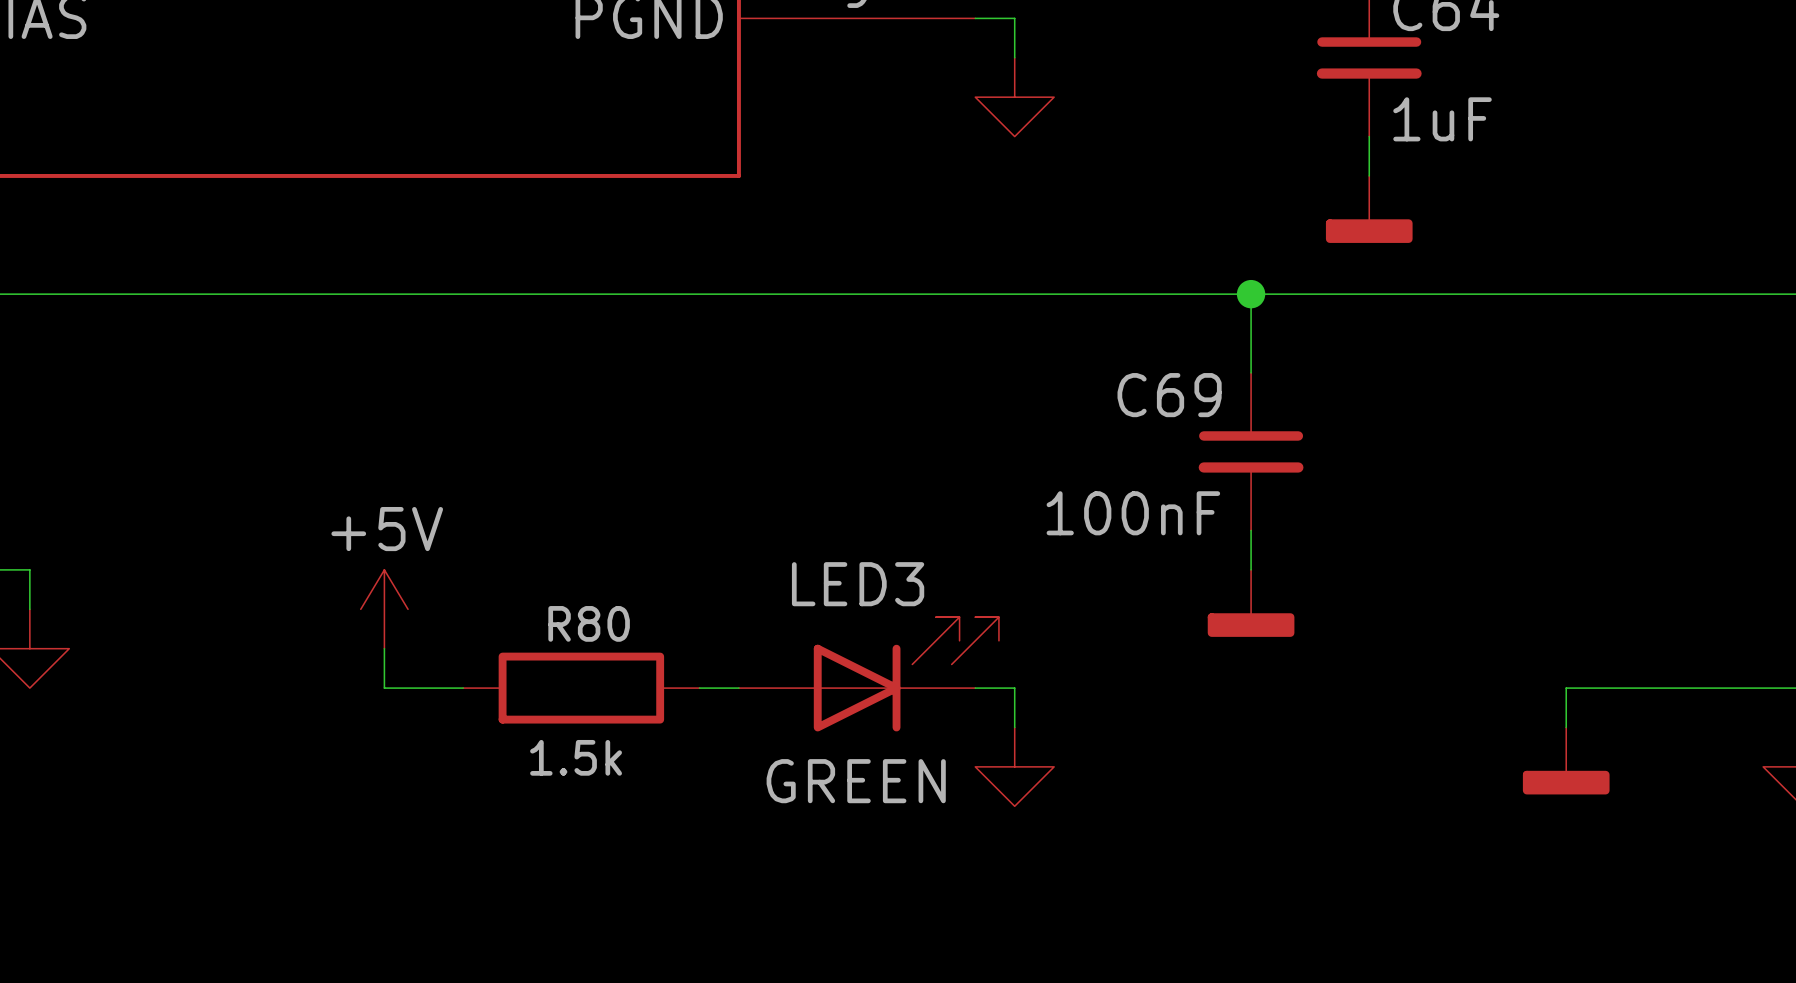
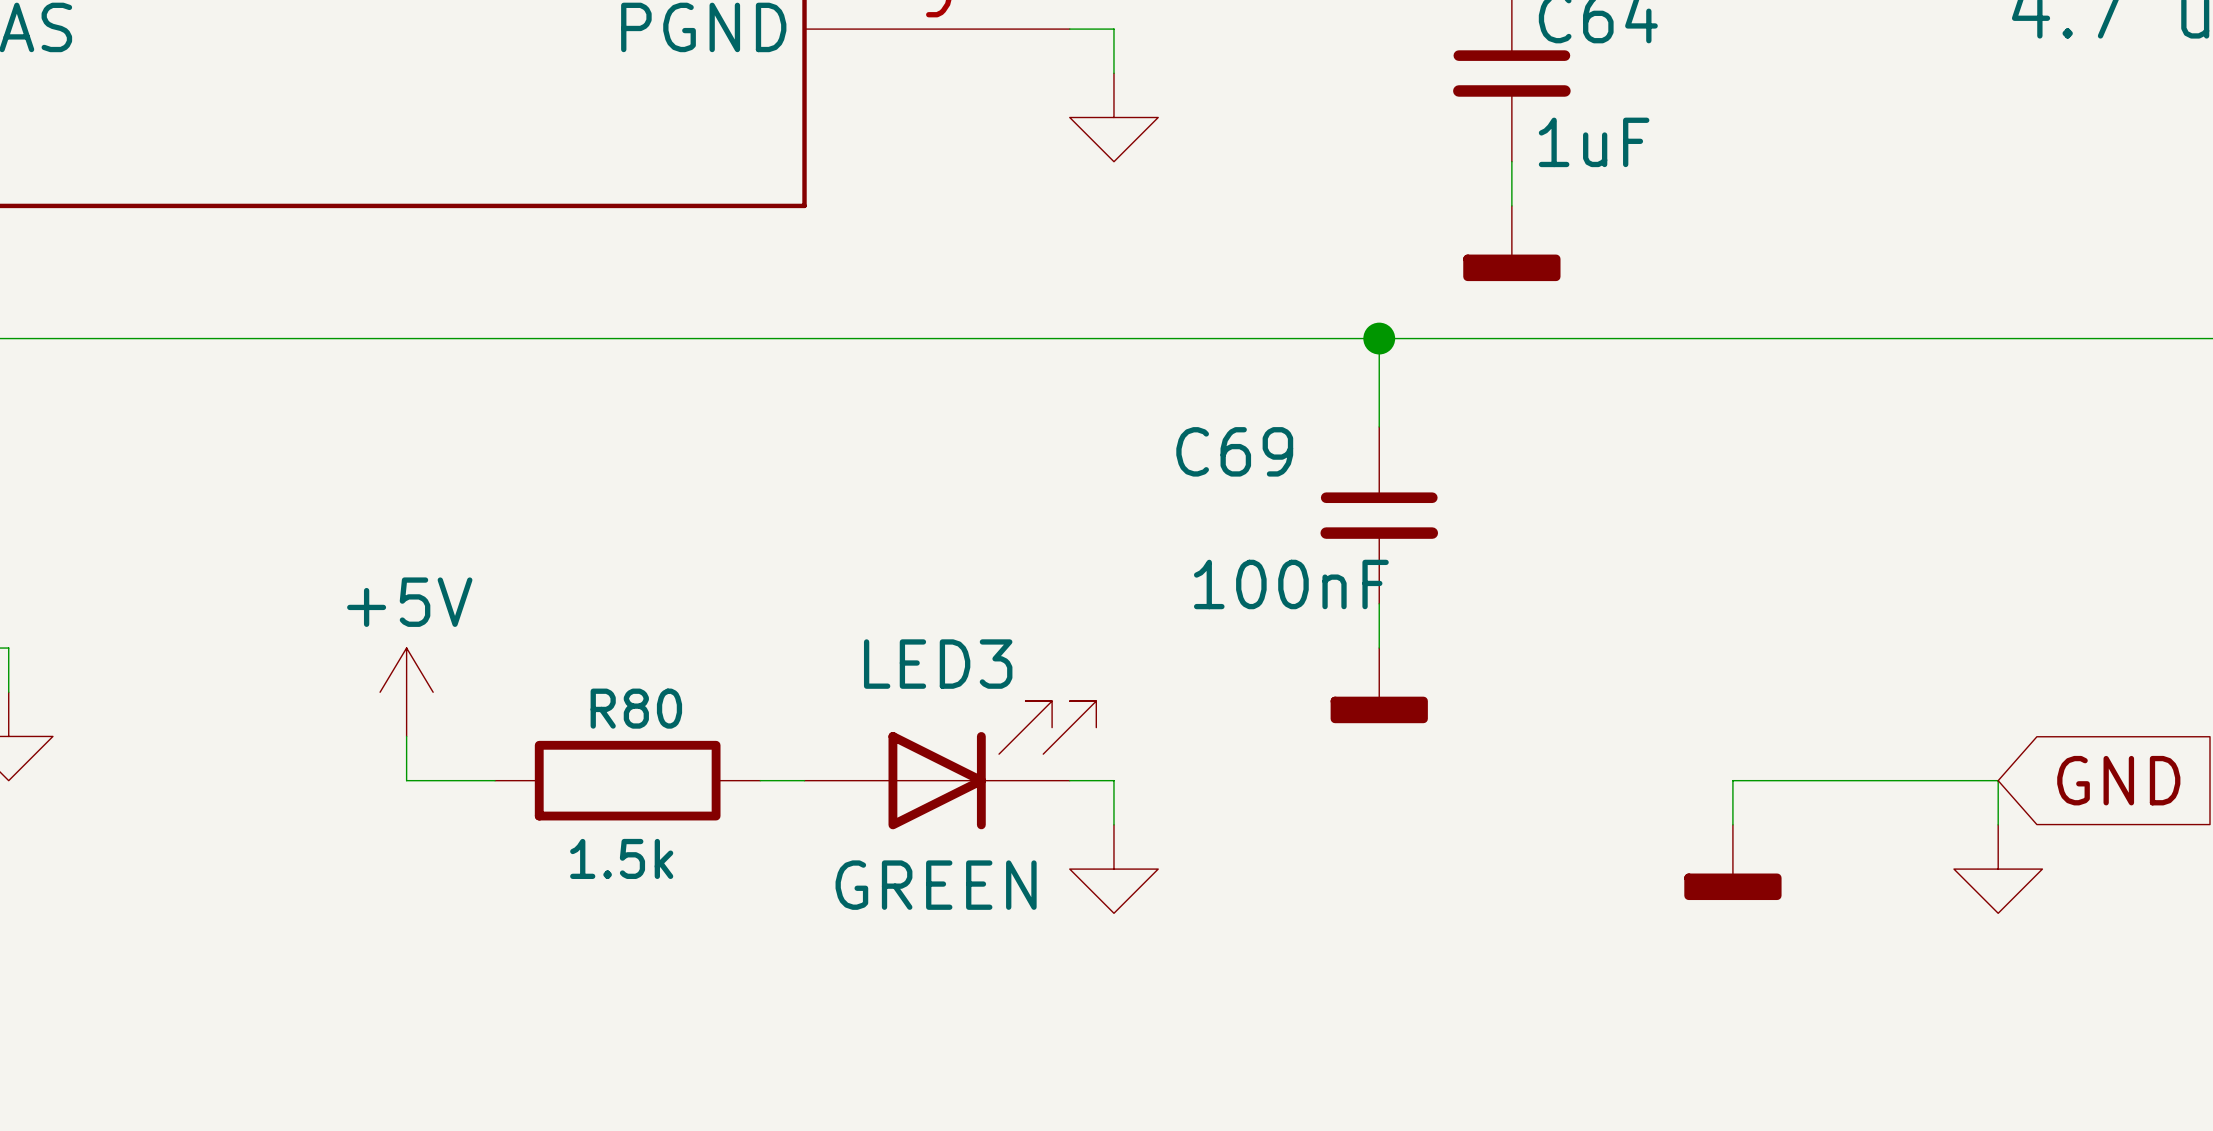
C69 name position: C69 (1169, 395) -> C69 (1234, 451)
C69 value position: 100nF (1133, 513) -> 100nF (1291, 584)

